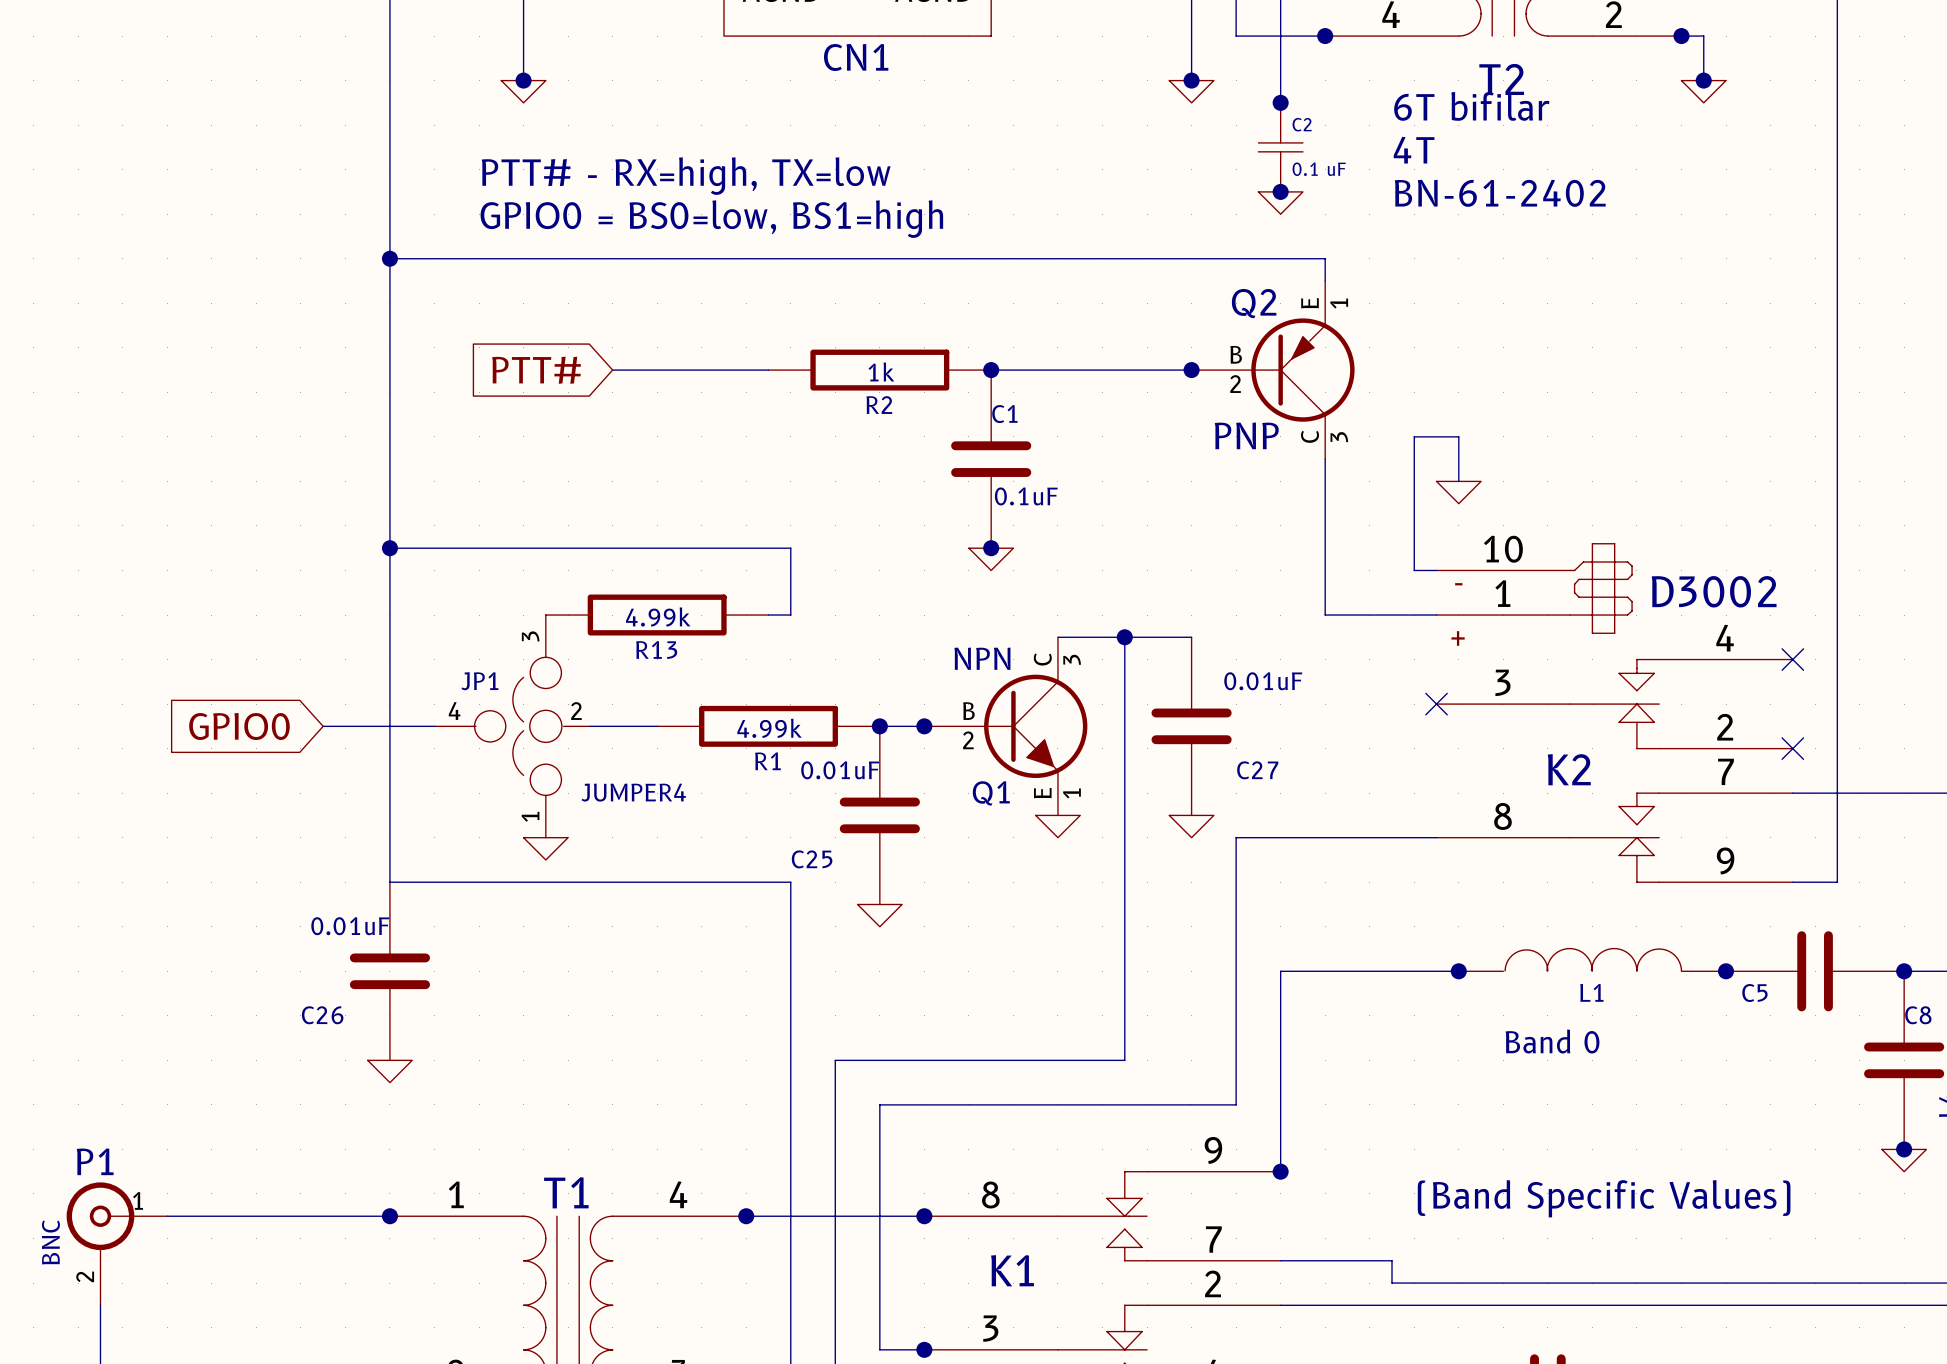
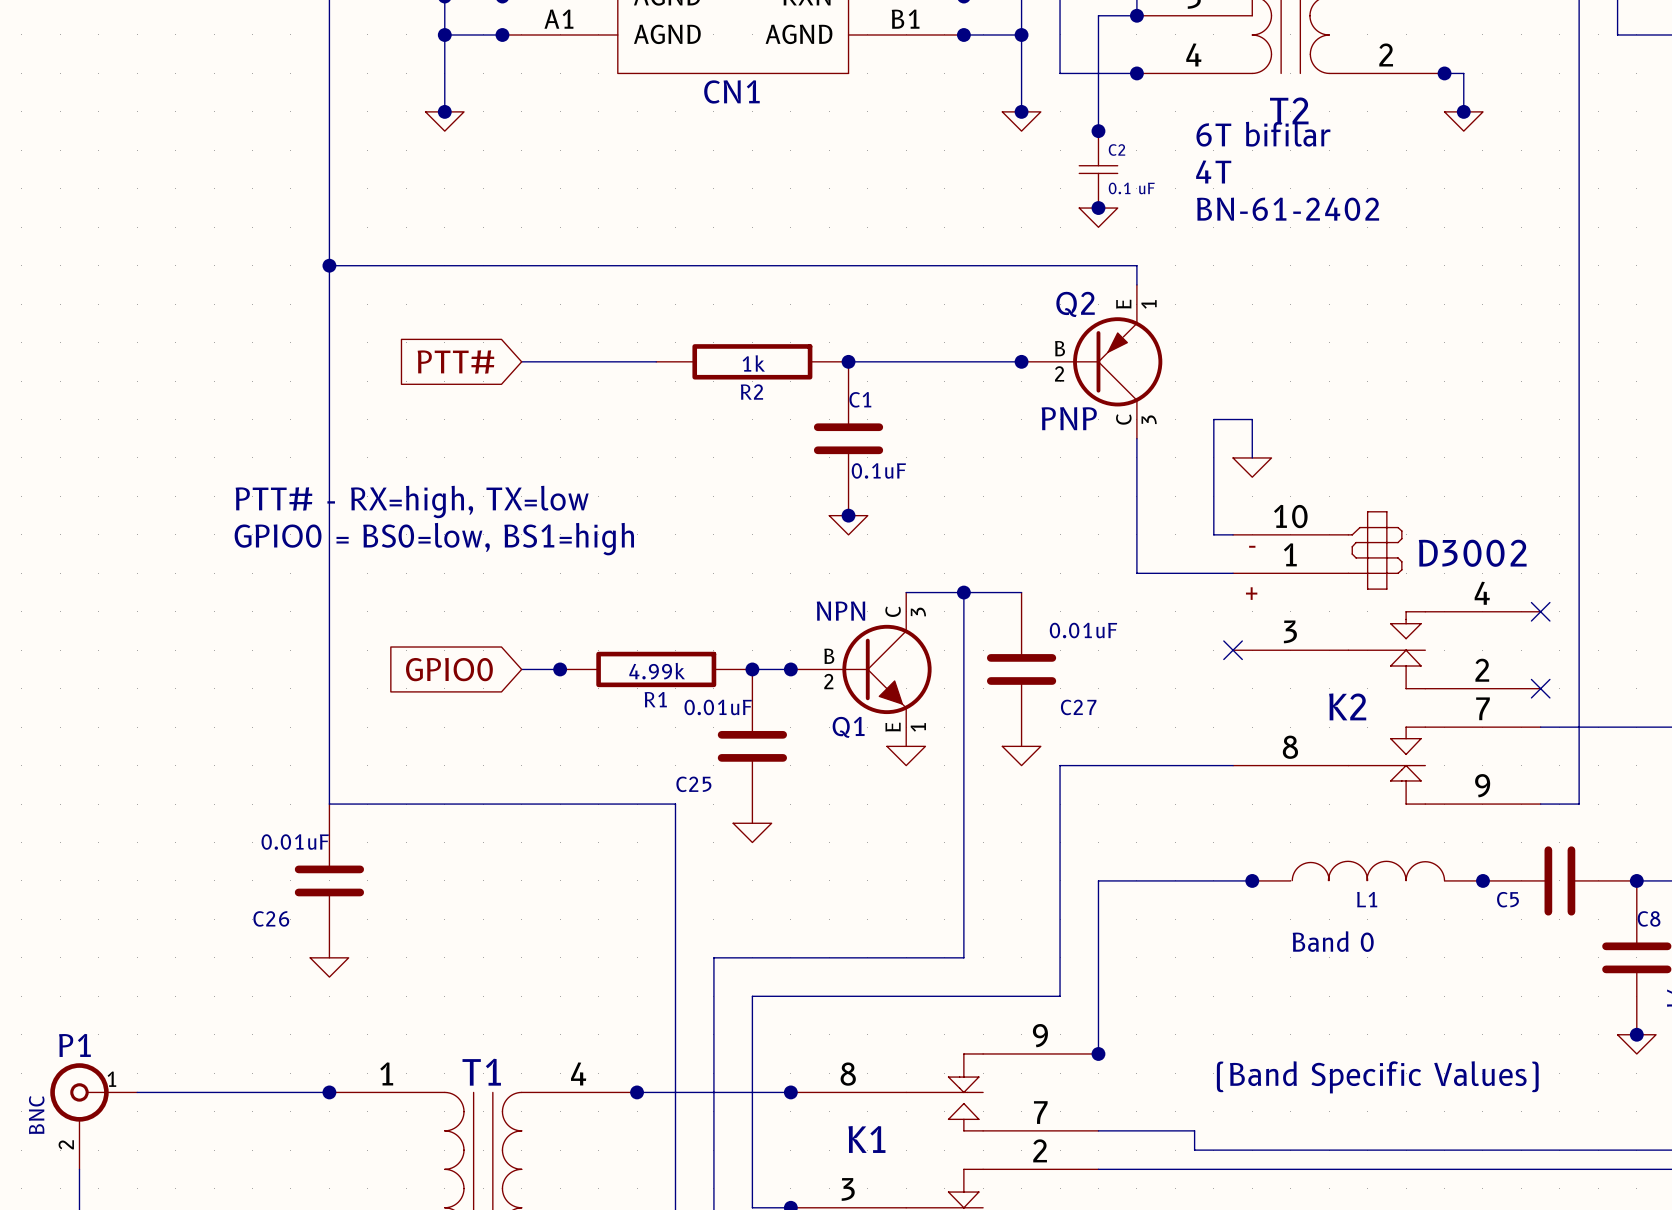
text position: PTT# - RX=high, TX=low (686, 176) -> PTT# - RX=high, TX=low (412, 501)
text position: GPIO0 = BS0=low, BS1=high (711, 219) -> GPIO0 = BS0=low, BS1=high (434, 539)
wire: (389, 548) (790, 548) (790, 615) (768, 615) -> none
junction: (389, 548) -> none
R13: 4.99k (657, 615) -> none
global label position: GPIO0 (239, 726) -> GPIO0 (449, 669)
wire: (323, 726) (434, 726) -> none
JP1: JUMPER4 (512, 726) -> none
wire: (590, 726) (612, 726) -> none
junction: none -> (560, 669)
power symbol: (545, 848) -> none

